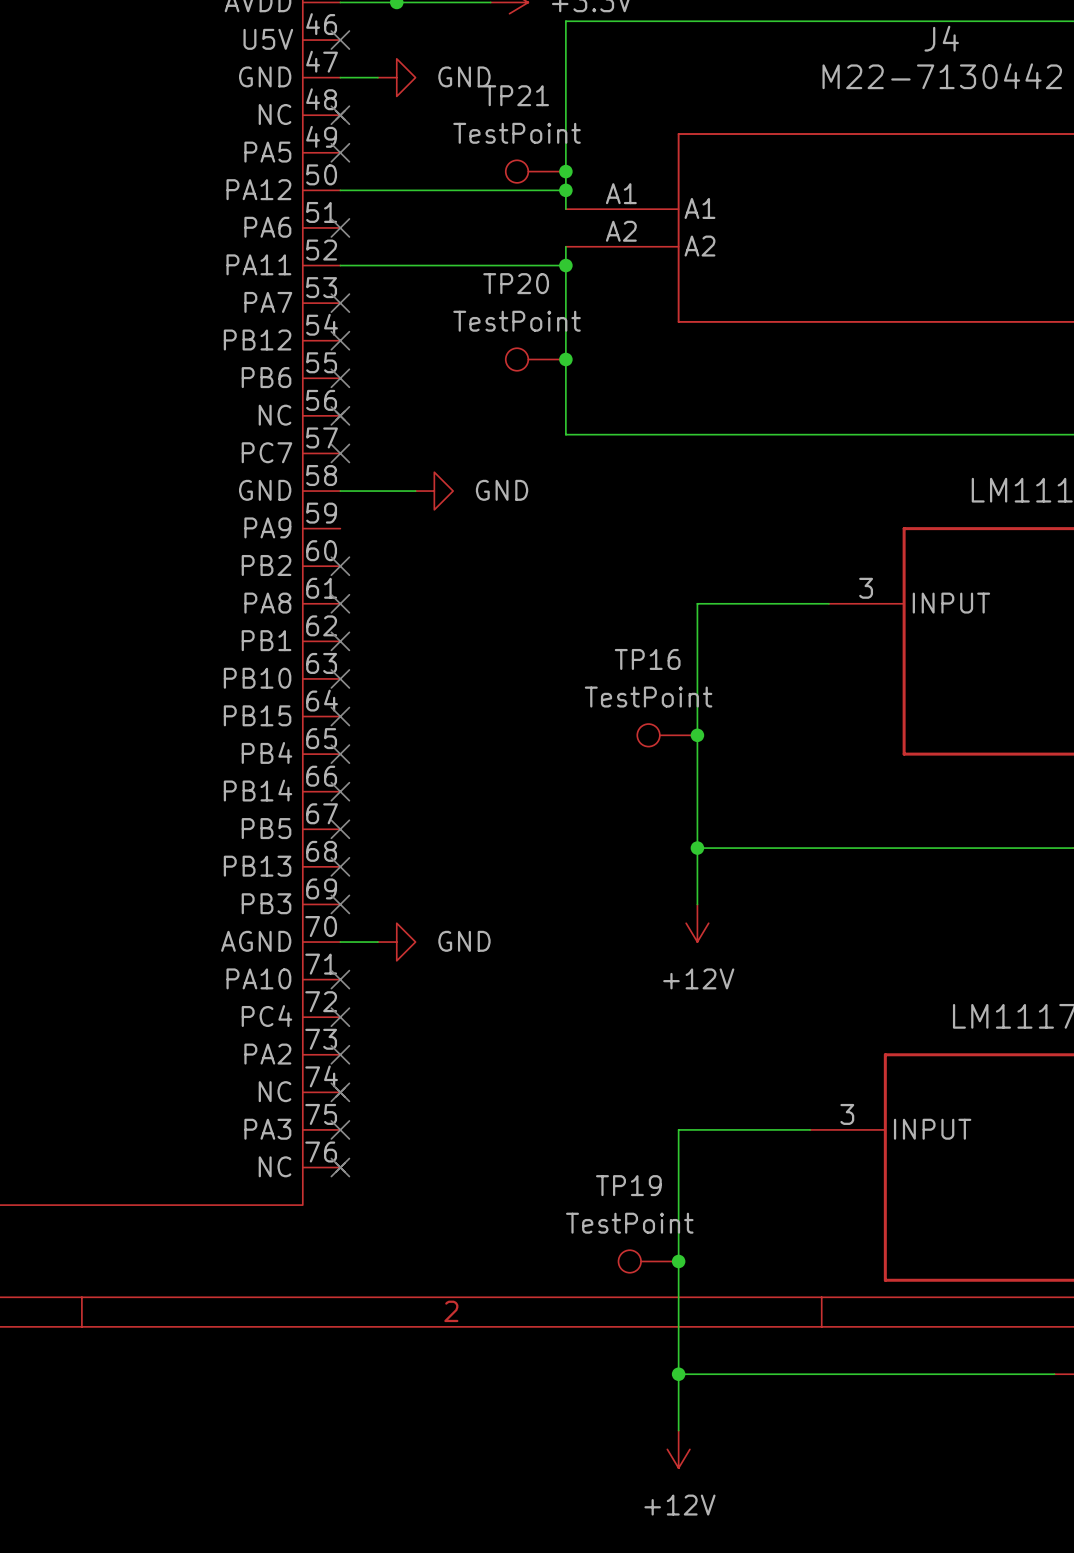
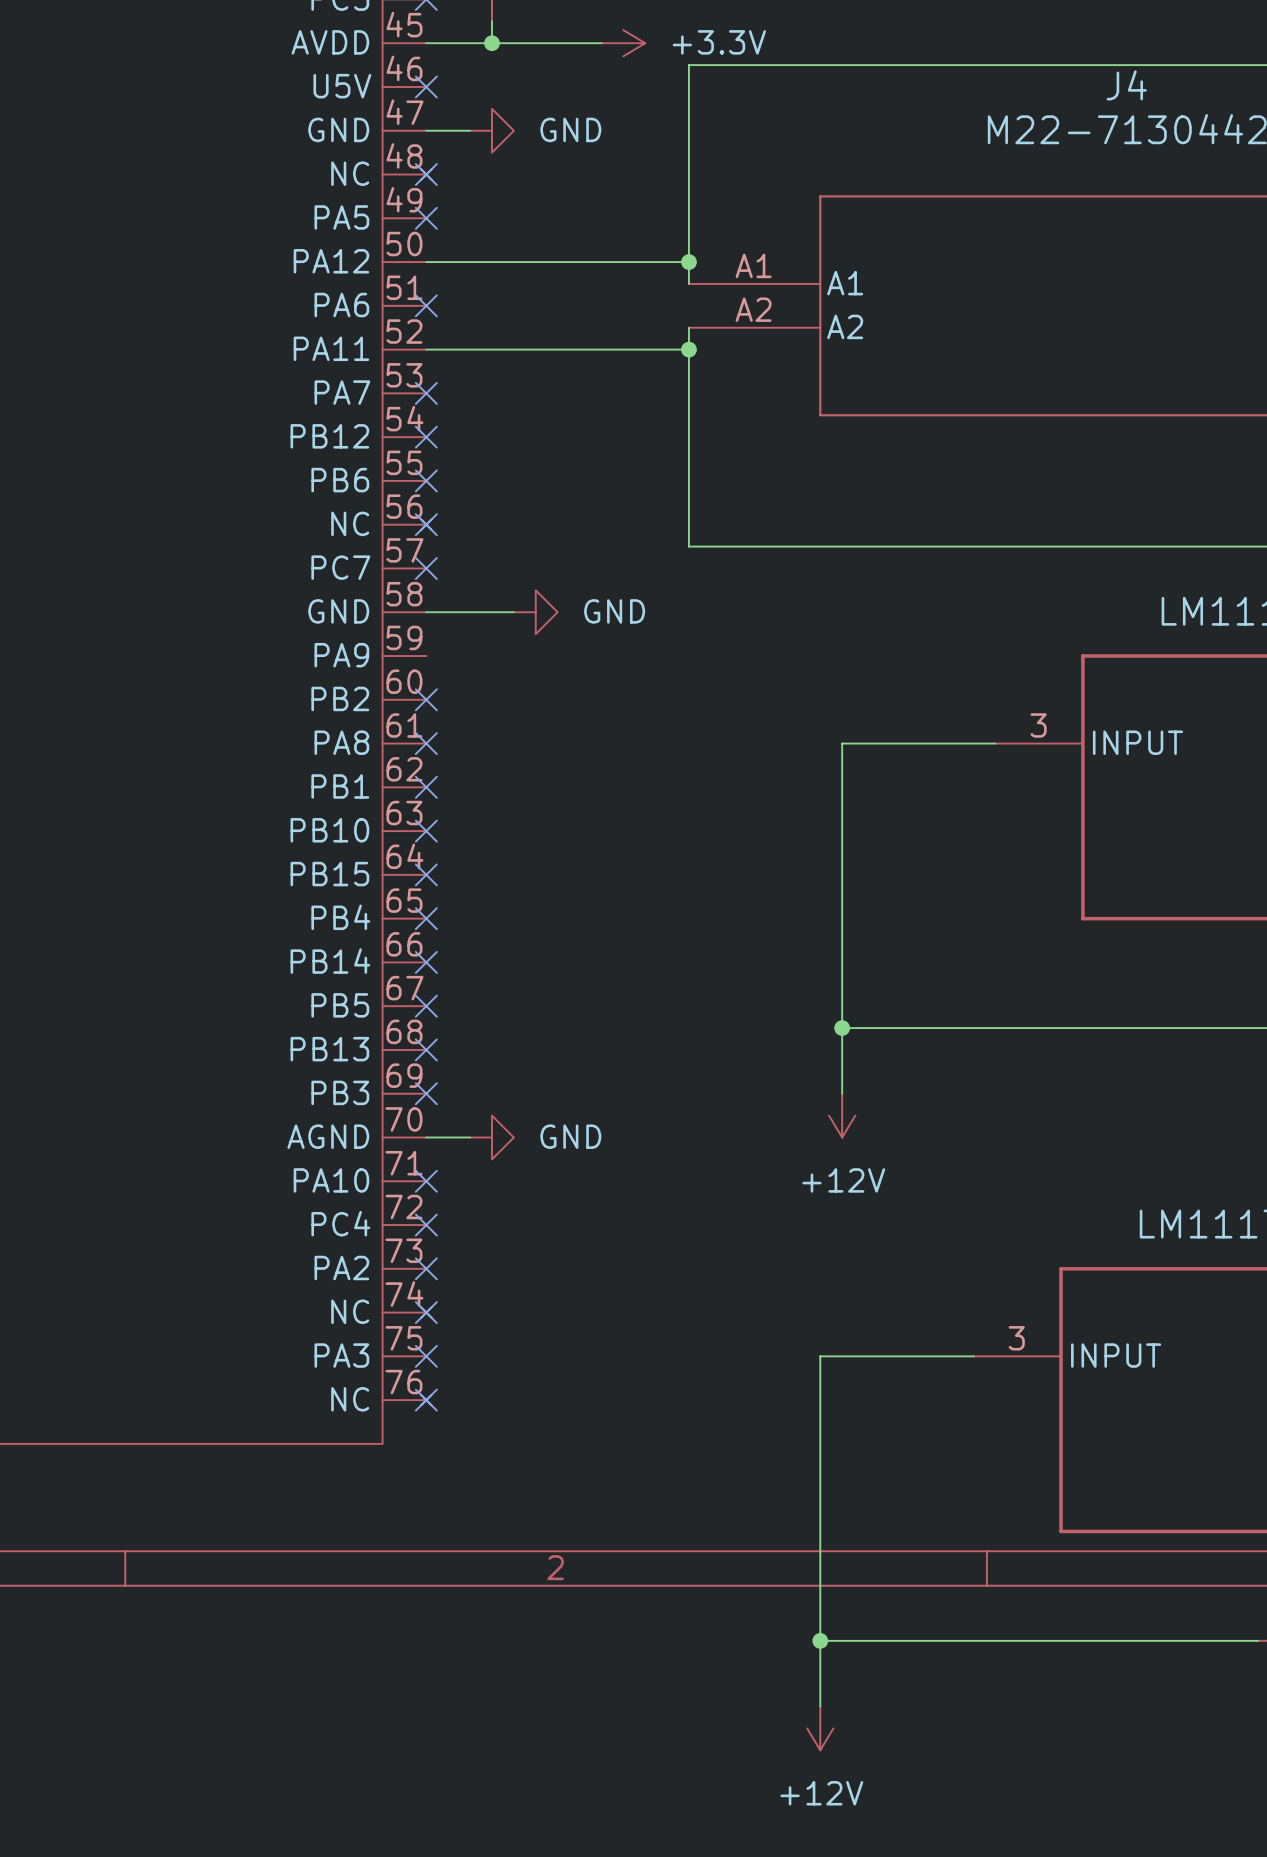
TP21: TestPoint (535, 171) -> none
junction: (565, 171) -> none
TP20: TestPoint (535, 359) -> none
junction: (565, 359) -> none
TP16: TestPoint (667, 735) -> none
junction: (697, 735) -> none
TP19: TestPoint (648, 1261) -> none
junction: (678, 1261) -> none

